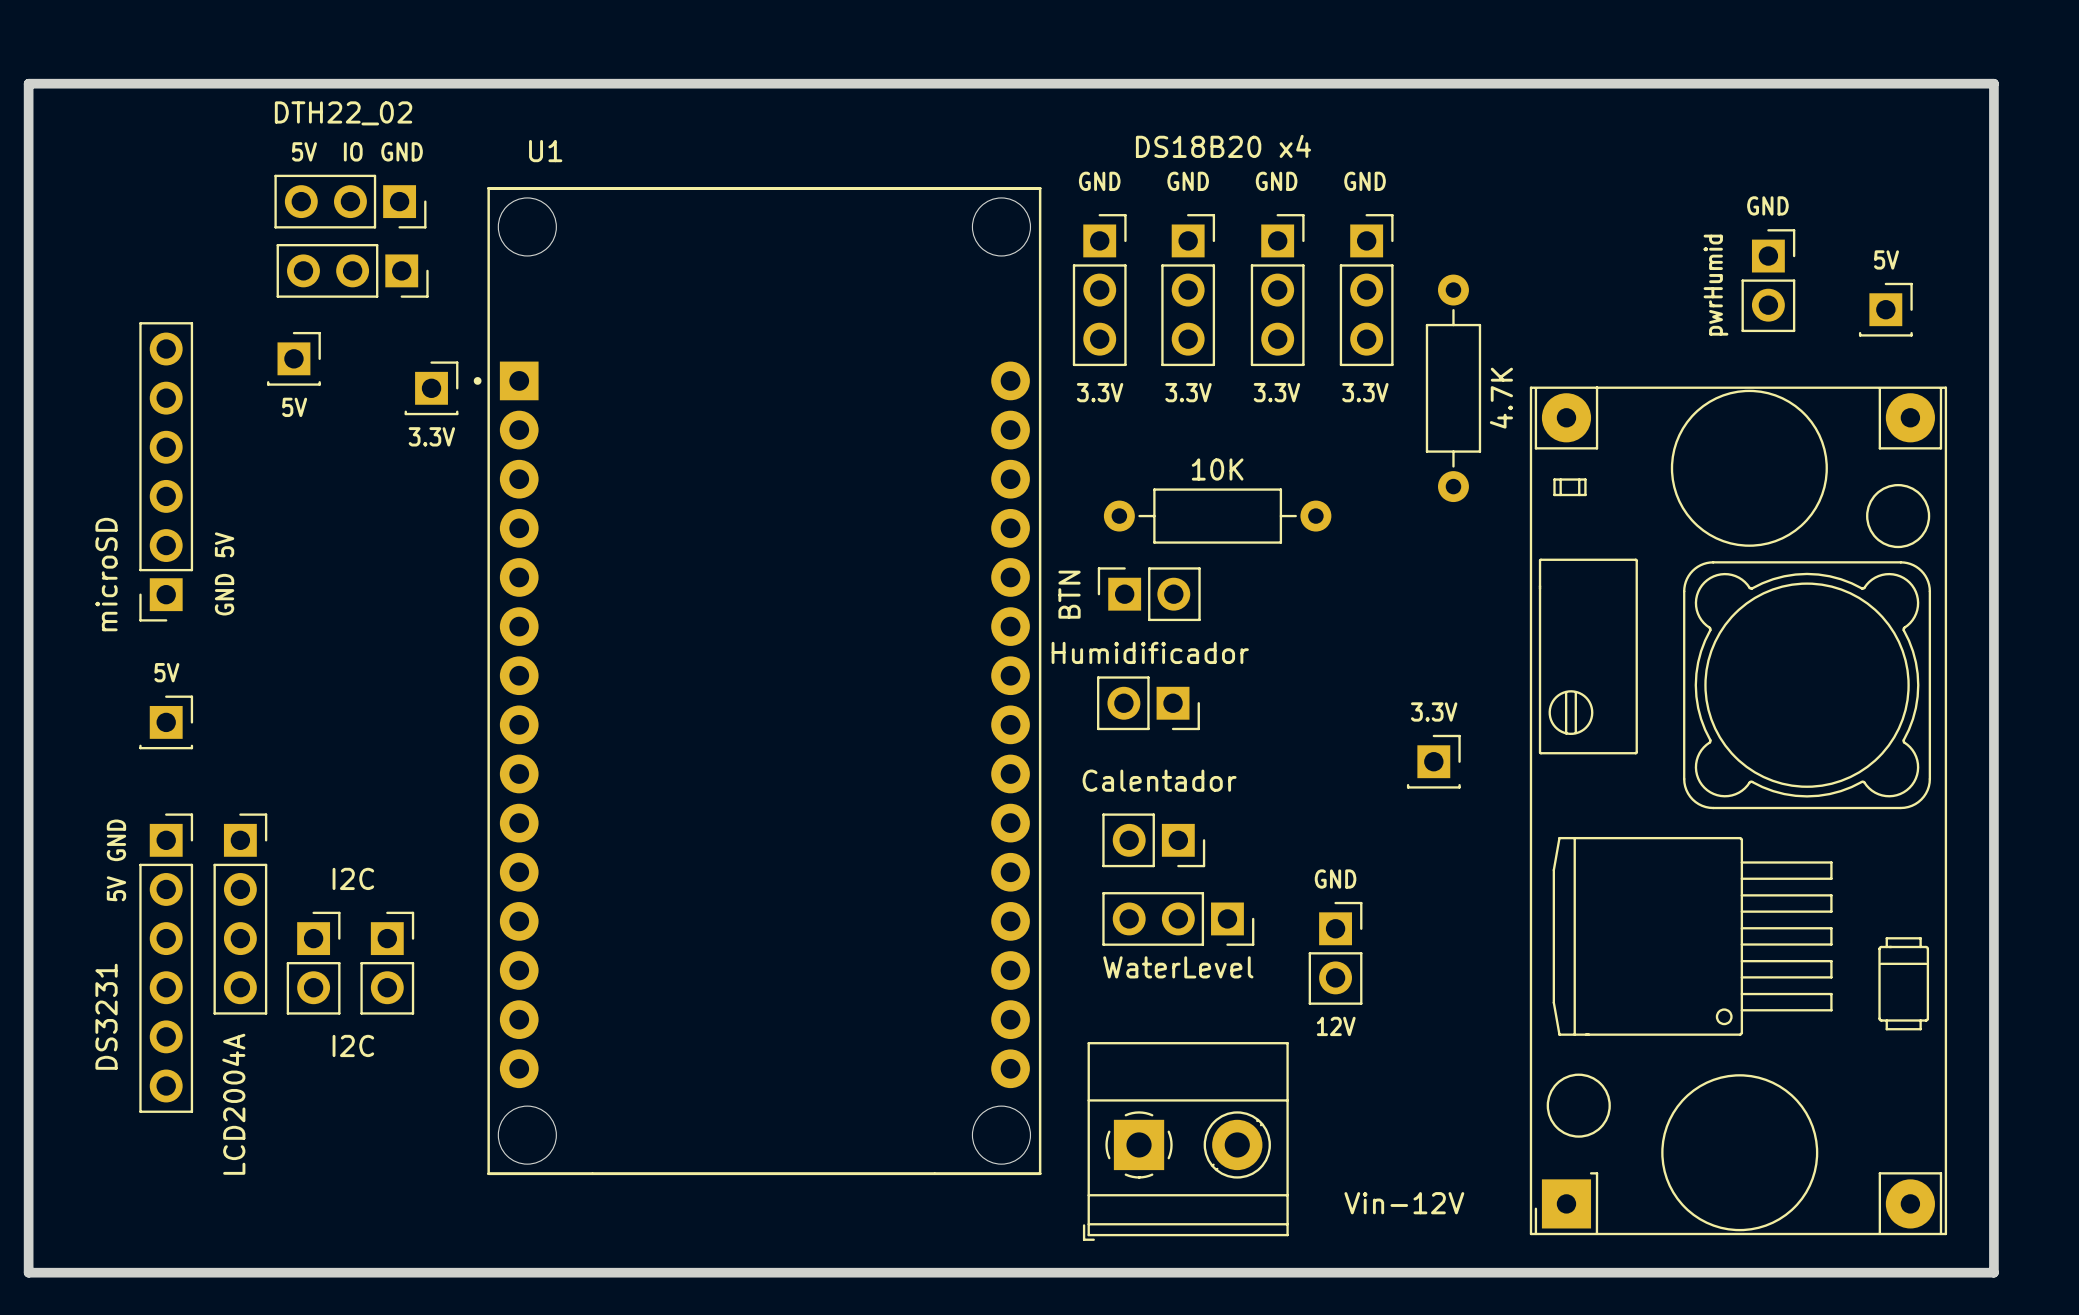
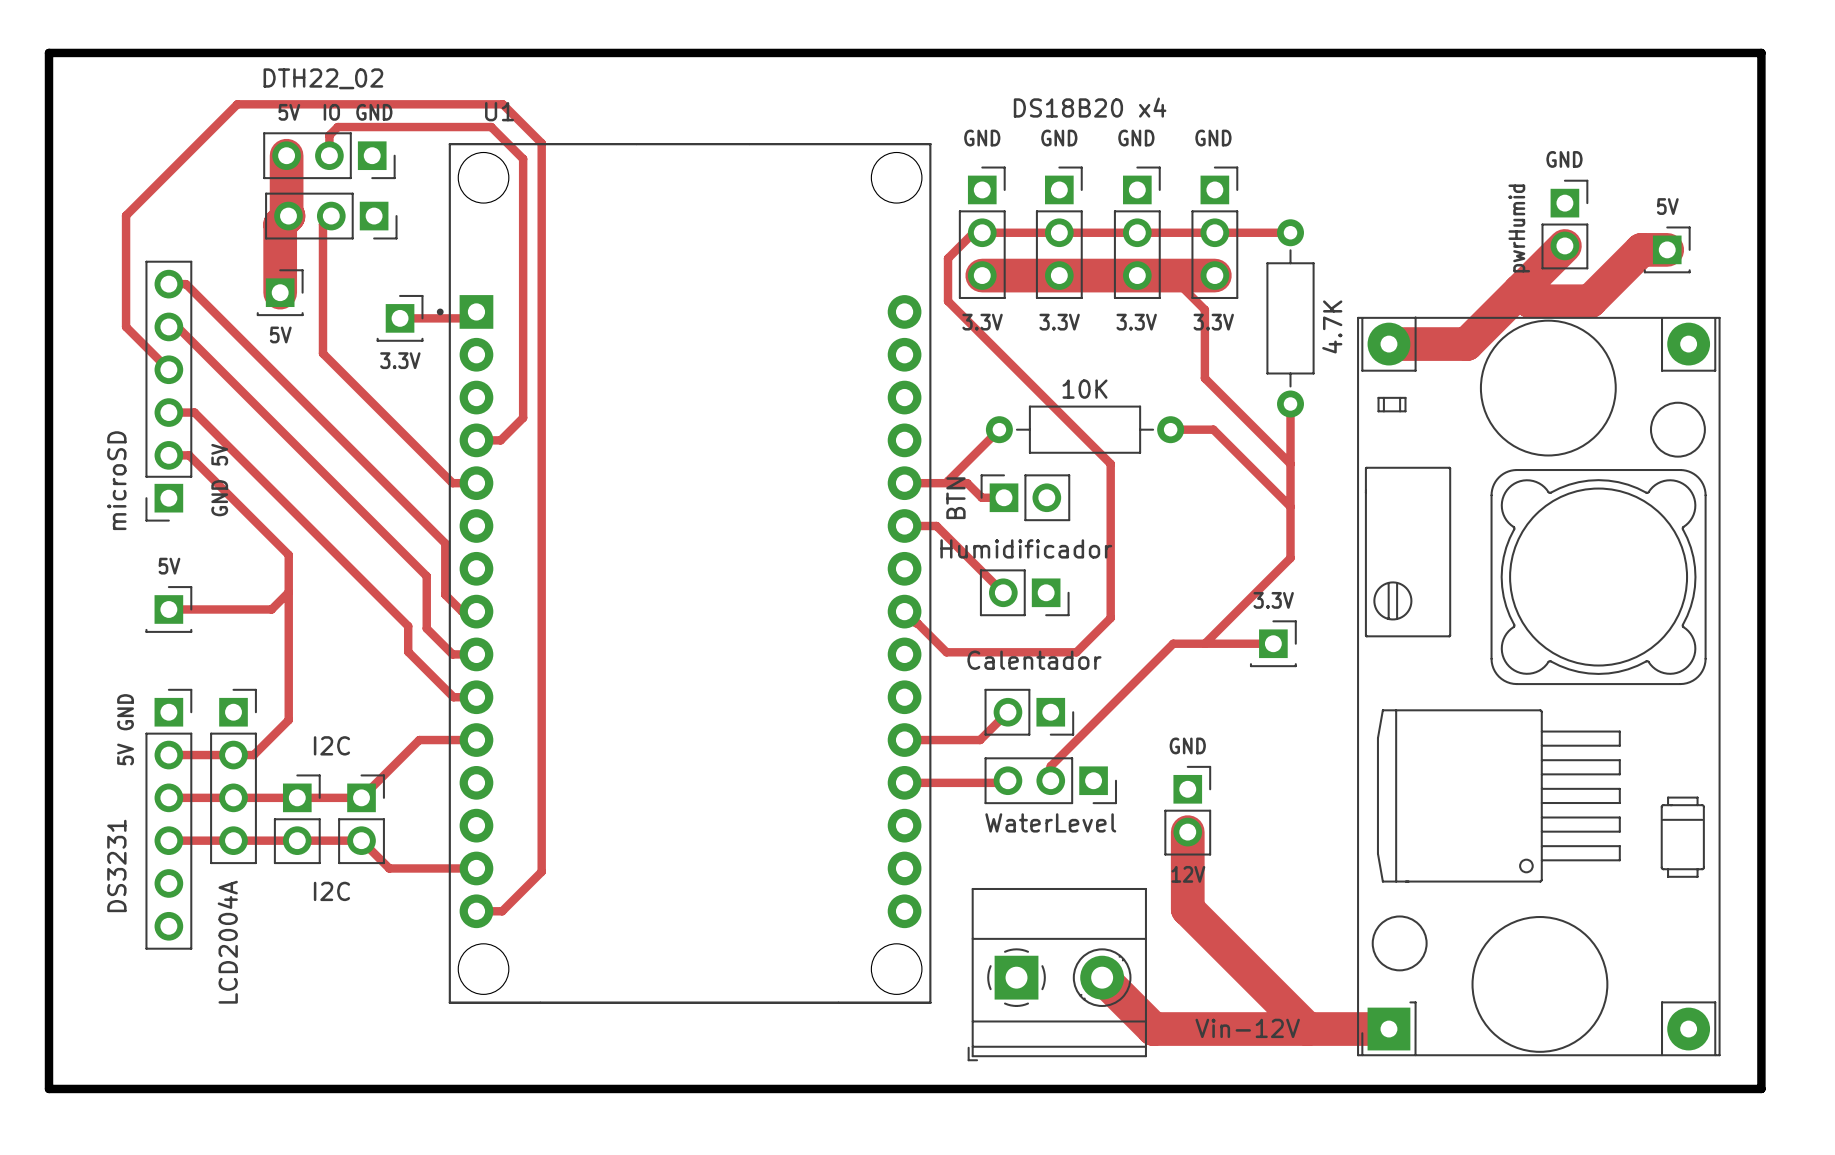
track: none -> (286, 155) (286, 214) (288, 216) (280, 224) (280, 292)
track: none -> (329, 155) (329, 135) (337, 127) (491, 127) (523, 158) (523, 417) (500, 440) (476, 440)
track: none -> (331, 216) (322, 224) (322, 353) (452, 483) (476, 483)
track: none -> (973, 232) (948, 258) (948, 301) (1110, 463) (1110, 618) (1076, 652) (946, 652) (904, 611)
track: none -> (982, 232) (1290, 232)
track: none -> (1564, 245) (1466, 344) (1388, 344)
track: none -> (1667, 249) (1641, 249) (1590, 301) (1530, 301) (1519, 290)
track: none -> (982, 275) (1214, 275)
track: none -> (1170, 275) (1204, 309) (1204, 378) (1290, 463)
track: none -> (168, 284) (185, 284) (445, 543) (445, 594) (462, 611) (476, 611)
track: none -> (400, 318) (470, 318)
track: none -> (177, 326) (426, 576) (426, 628) (452, 654) (476, 654)
track: none -> (168, 369) (126, 326) (126, 215) (237, 104) (502, 104) (541, 143) (541, 871) (502, 911) (476, 911)
track: none -> (1290, 404) (1290, 558) (1204, 643)
track: none -> (168, 412) (194, 412) (408, 626) (408, 651) (453, 697) (476, 697)
track: none -> (999, 429) (948, 483)
track: none -> (1170, 429) (1213, 429) (1290, 506)
track: none -> (168, 455) (189, 455) (288, 554) (288, 720) (253, 755) (168, 755)
track: none -> (904, 483) (967, 483) (981, 497) (1004, 497)
track: none -> (904, 525) (936, 525) (1003, 592)
track: none -> (288, 592) (271, 609) (168, 609)
track: none -> (1273, 643) (1173, 643) (1050, 766) (1050, 780)
track: none -> (1007, 712) (980, 740) (904, 740)
track: none -> (476, 740) (419, 740) (361, 797) (168, 797)
track: none -> (904, 782) (1005, 782)
track: none -> (1187, 832) (1187, 909) (1307, 1029)
track: none -> (168, 840) (361, 840) (389, 868) (476, 868)
track: none -> (1102, 977) (1153, 1029) (1388, 1029)

